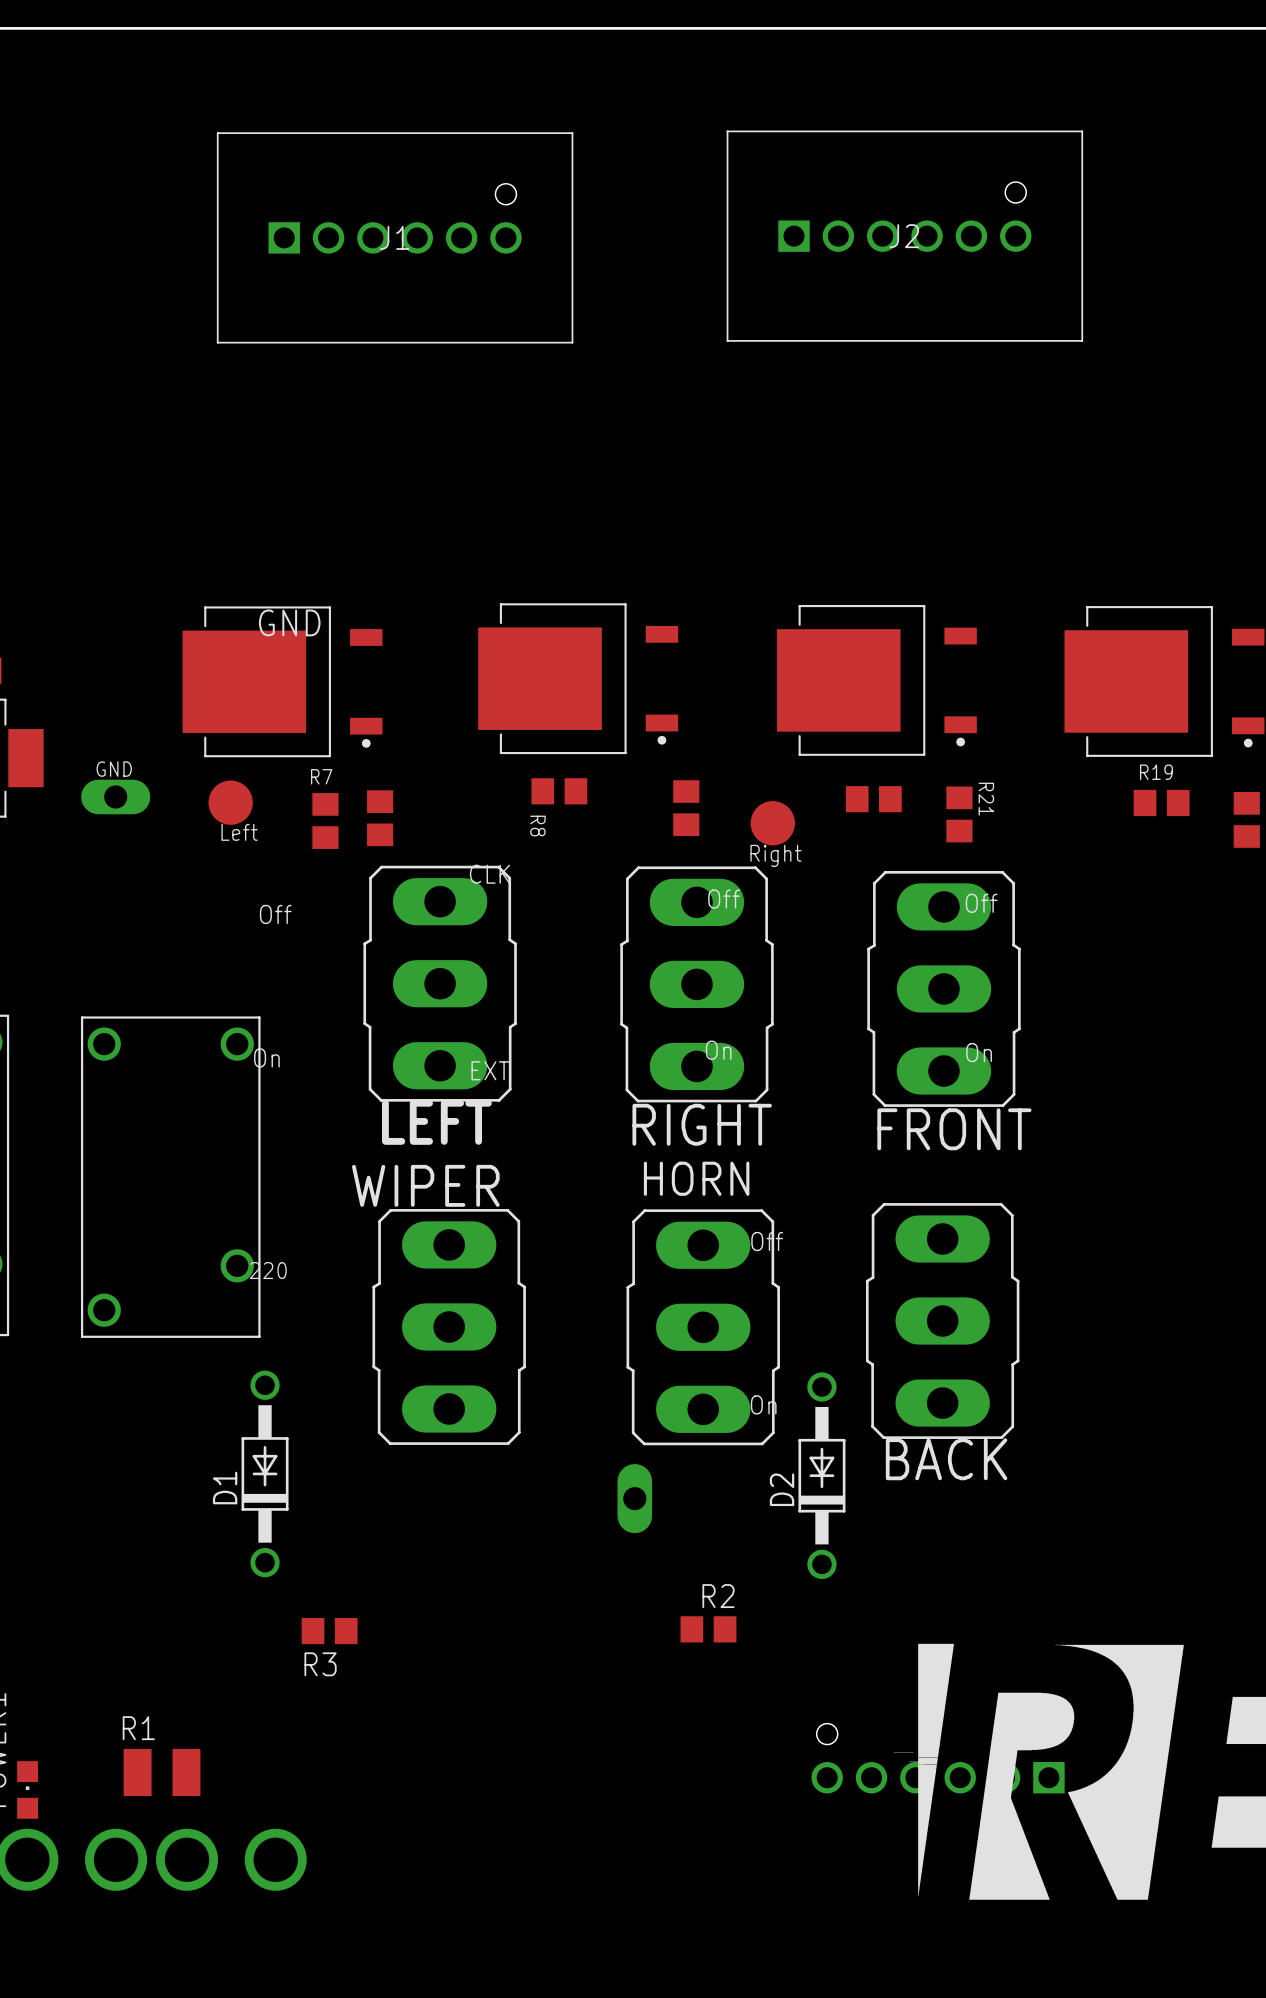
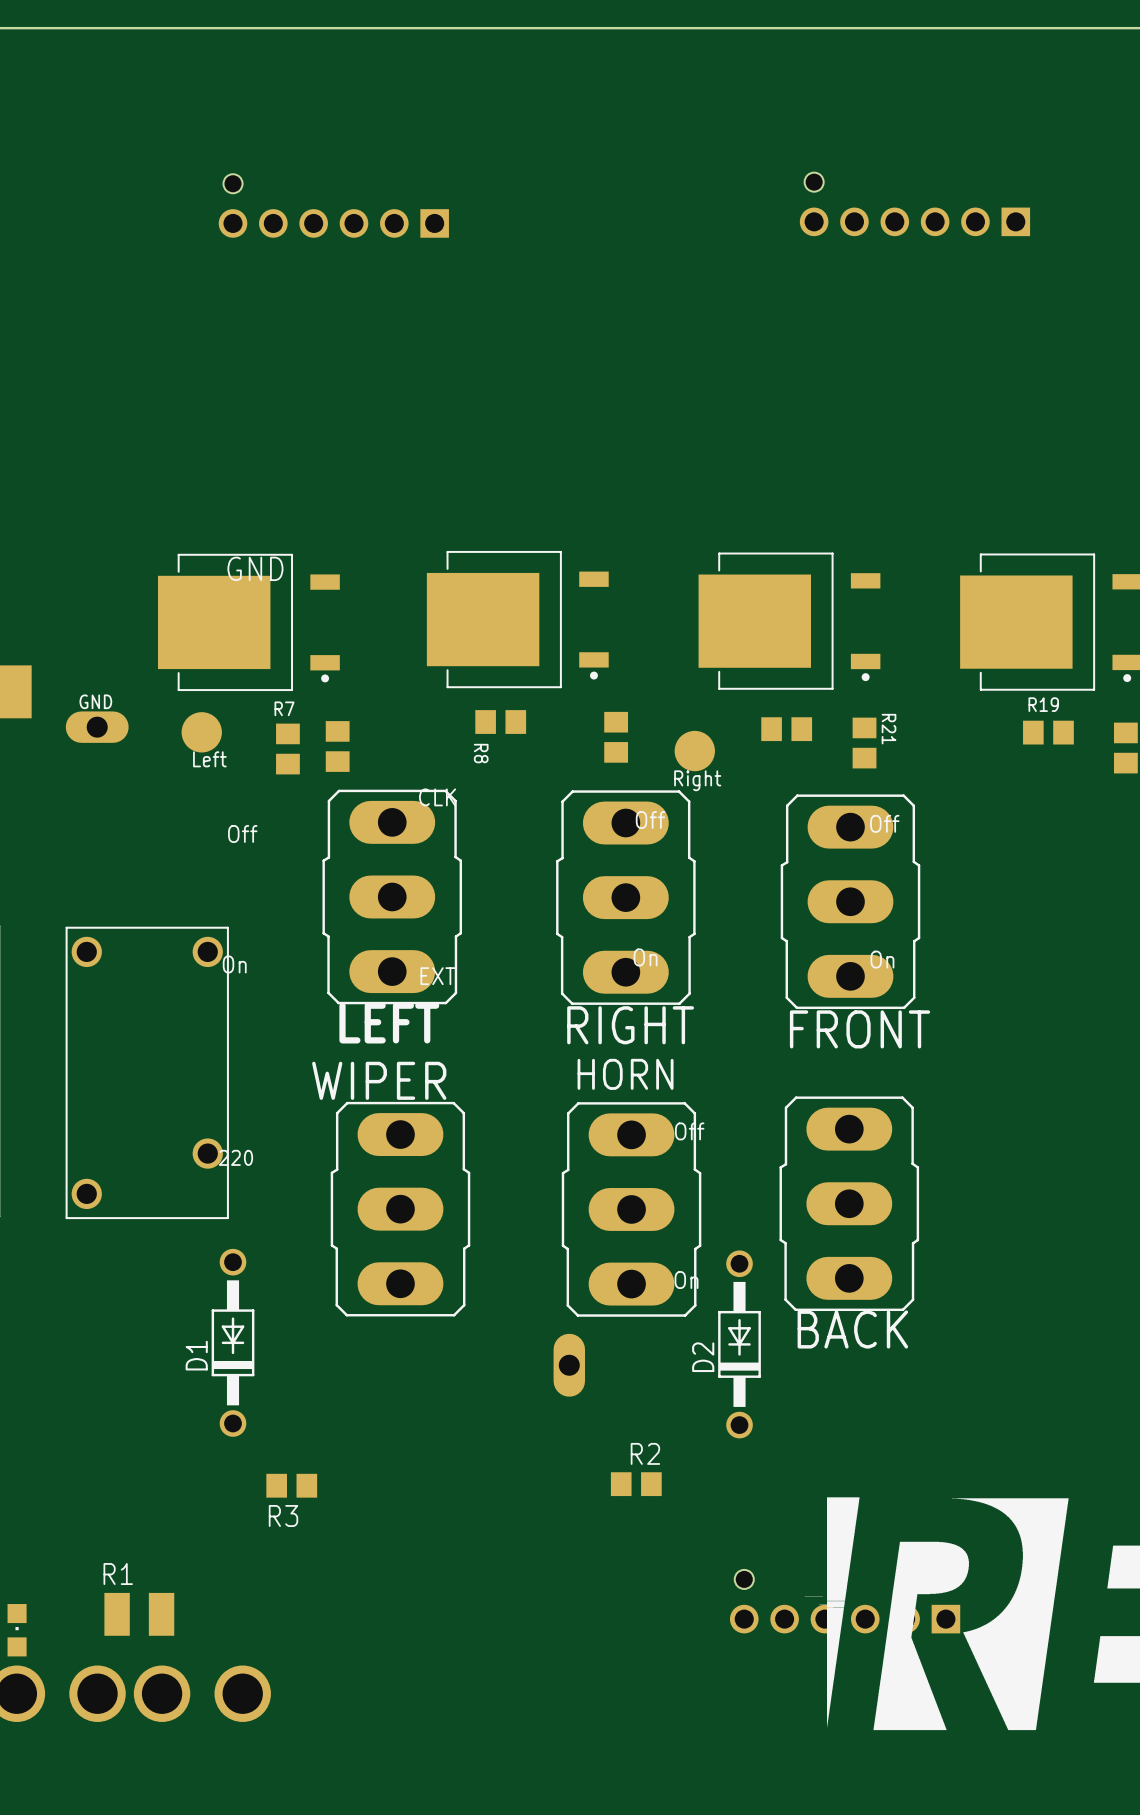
J2 side: top (904, 236) -> bottom (914, 204)
J1 side: top (395, 237) -> bottom (333, 205)

